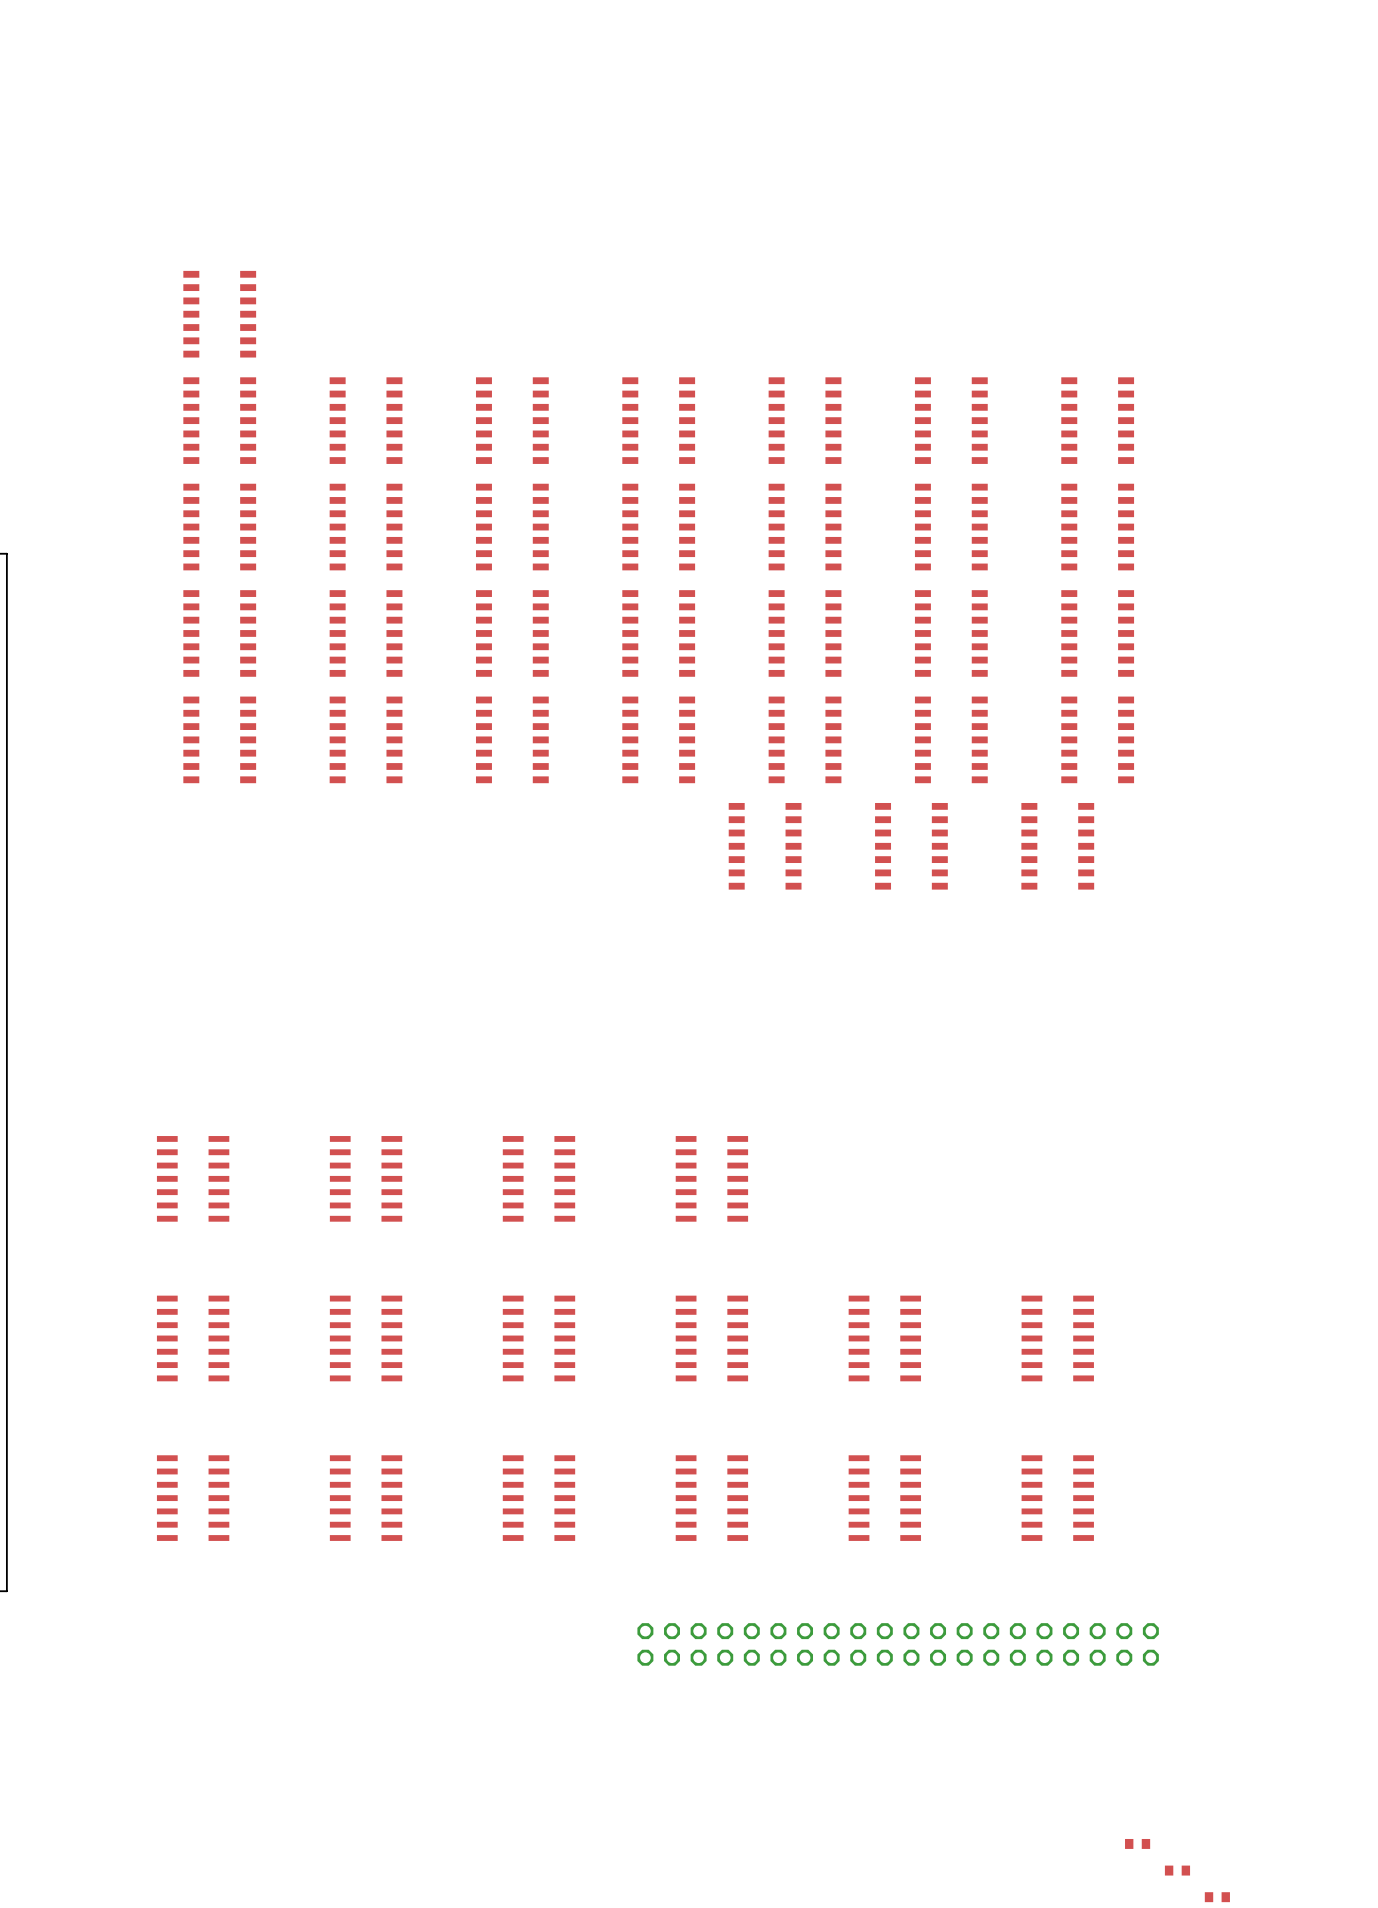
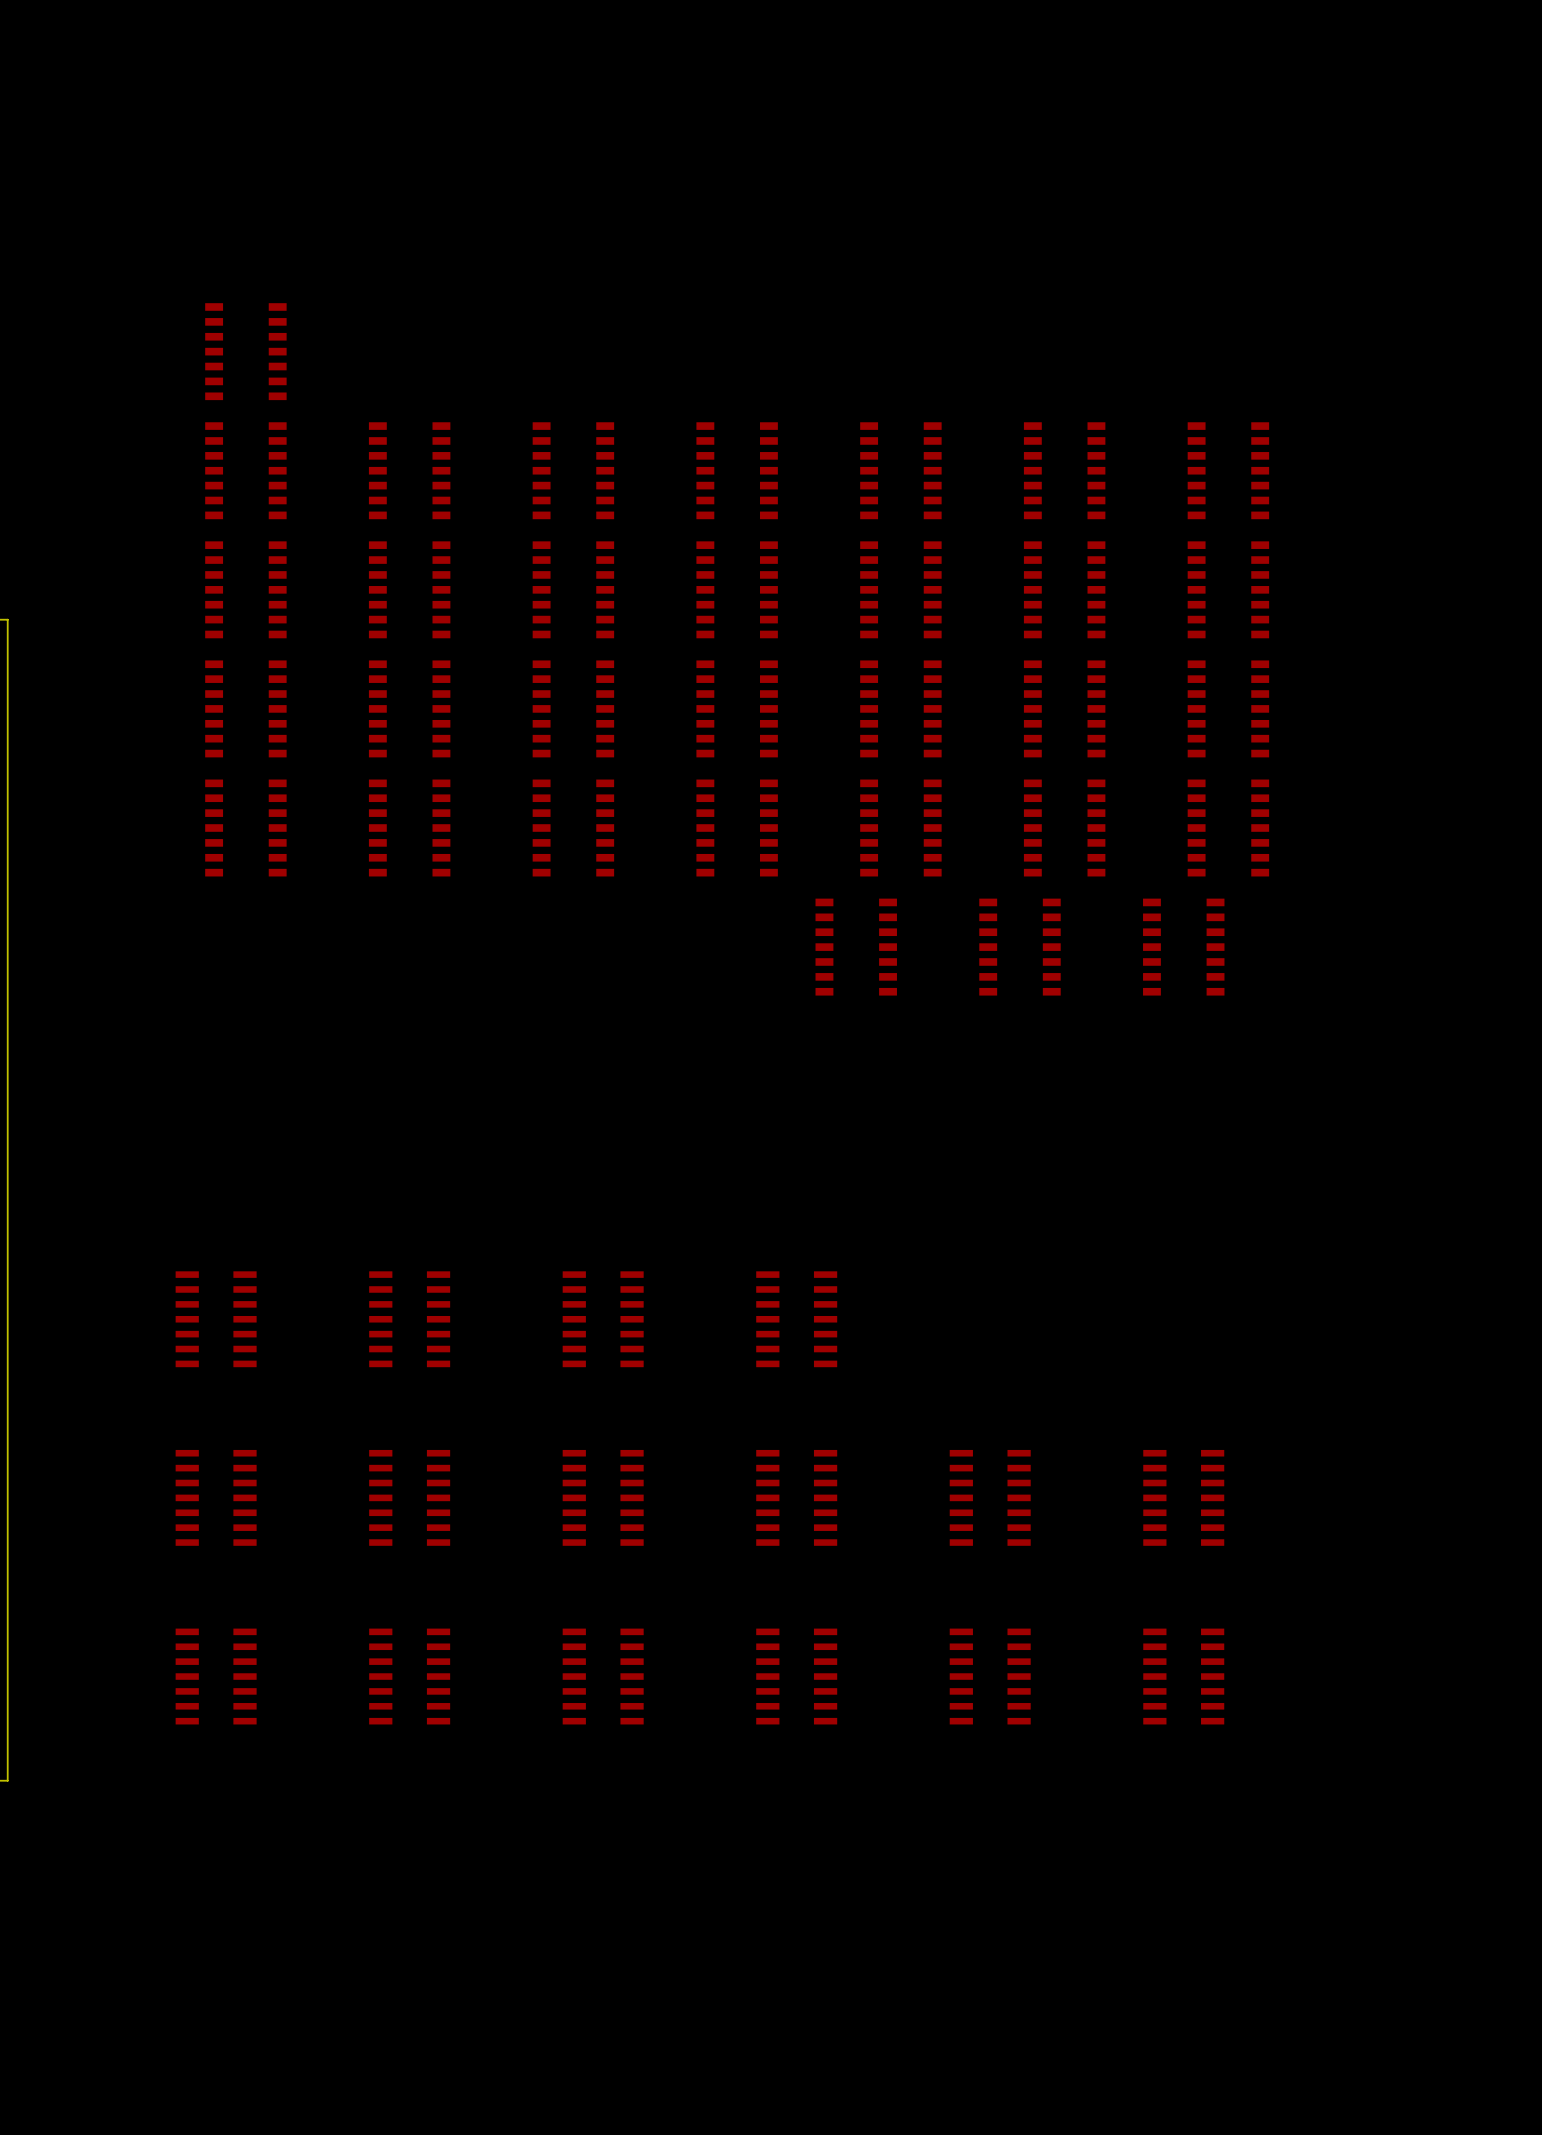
part: (898, 1644) -> none
part: (1137, 1843) -> none
part: (1177, 1870) -> none
part: (1217, 1897) -> none

